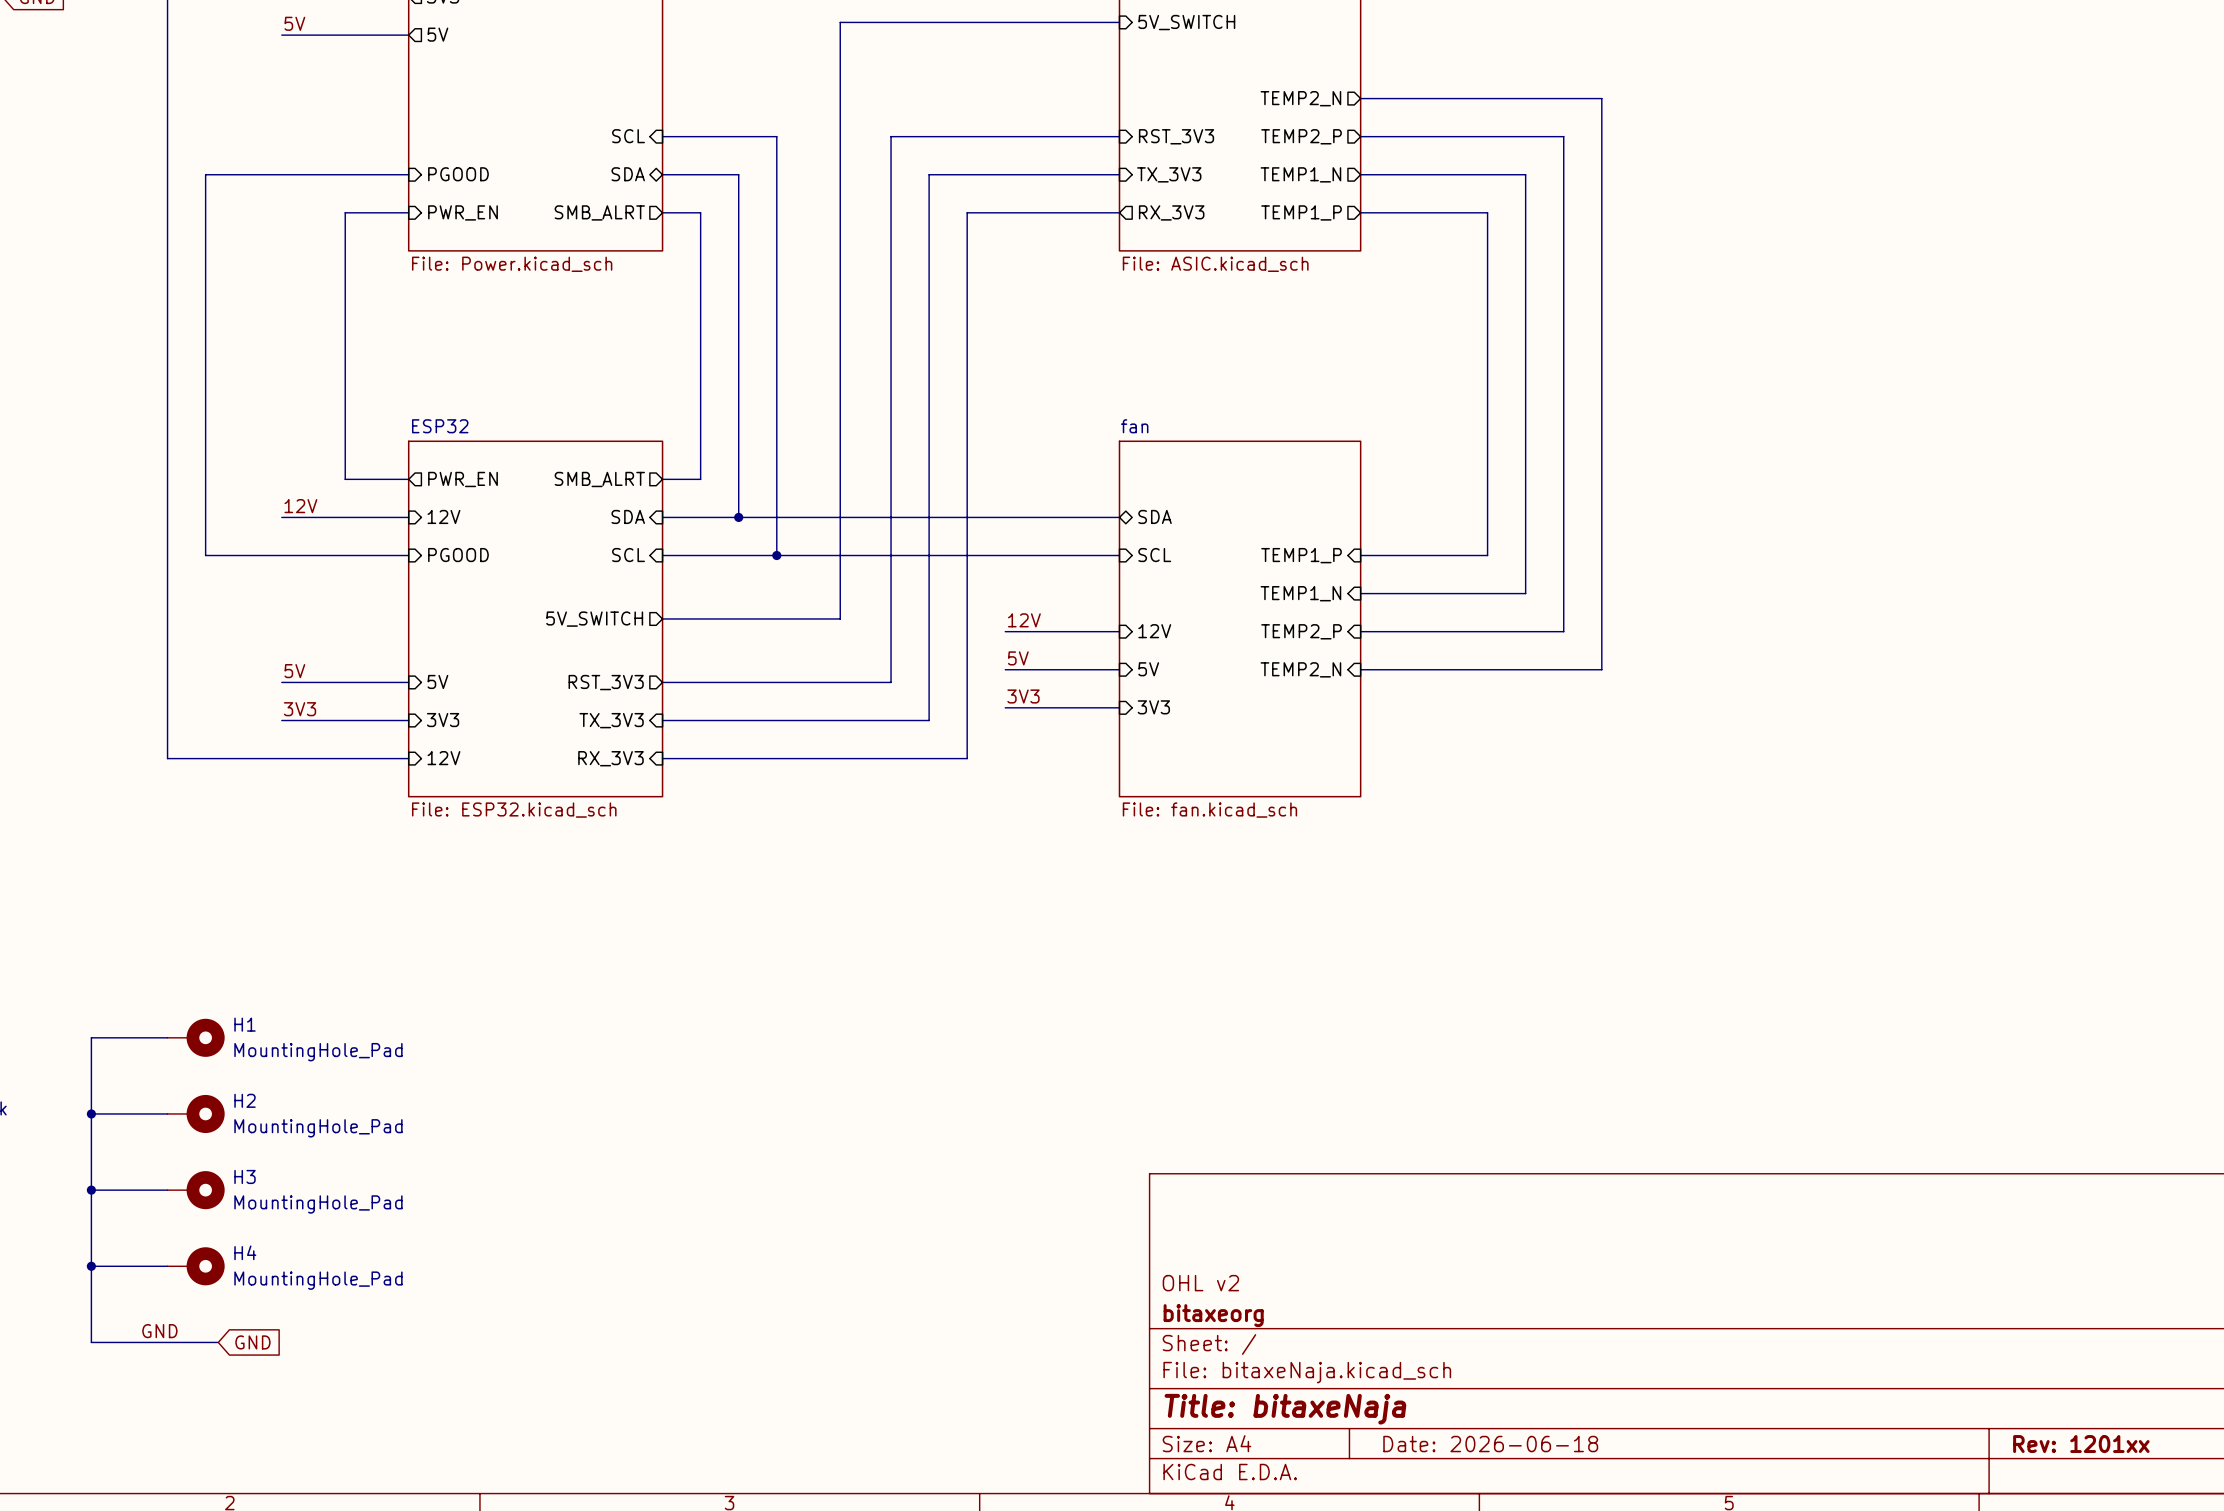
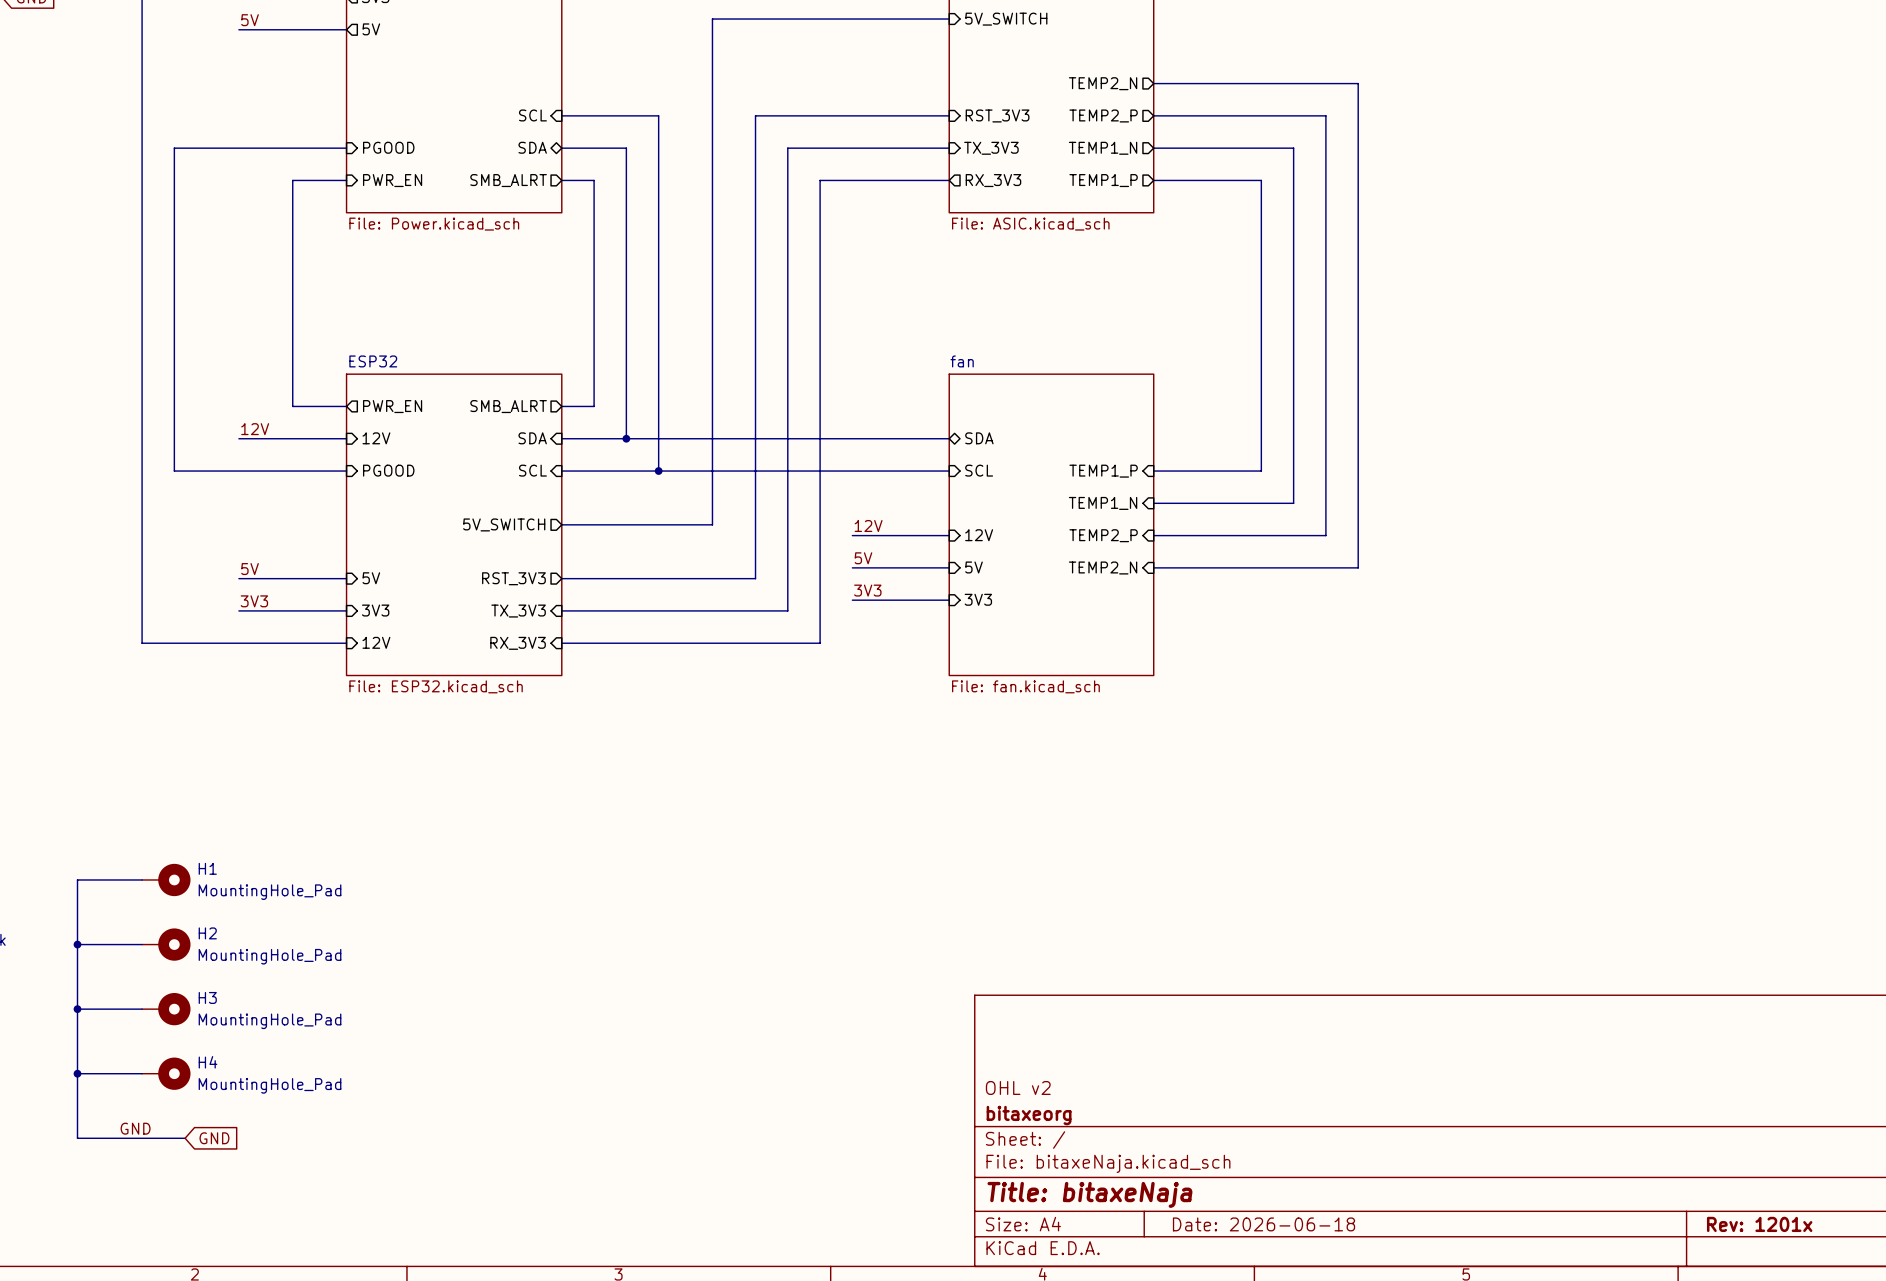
title block: Rev: 1201xx (2081, 1444) -> Rev: 1201x (1759, 1224)

